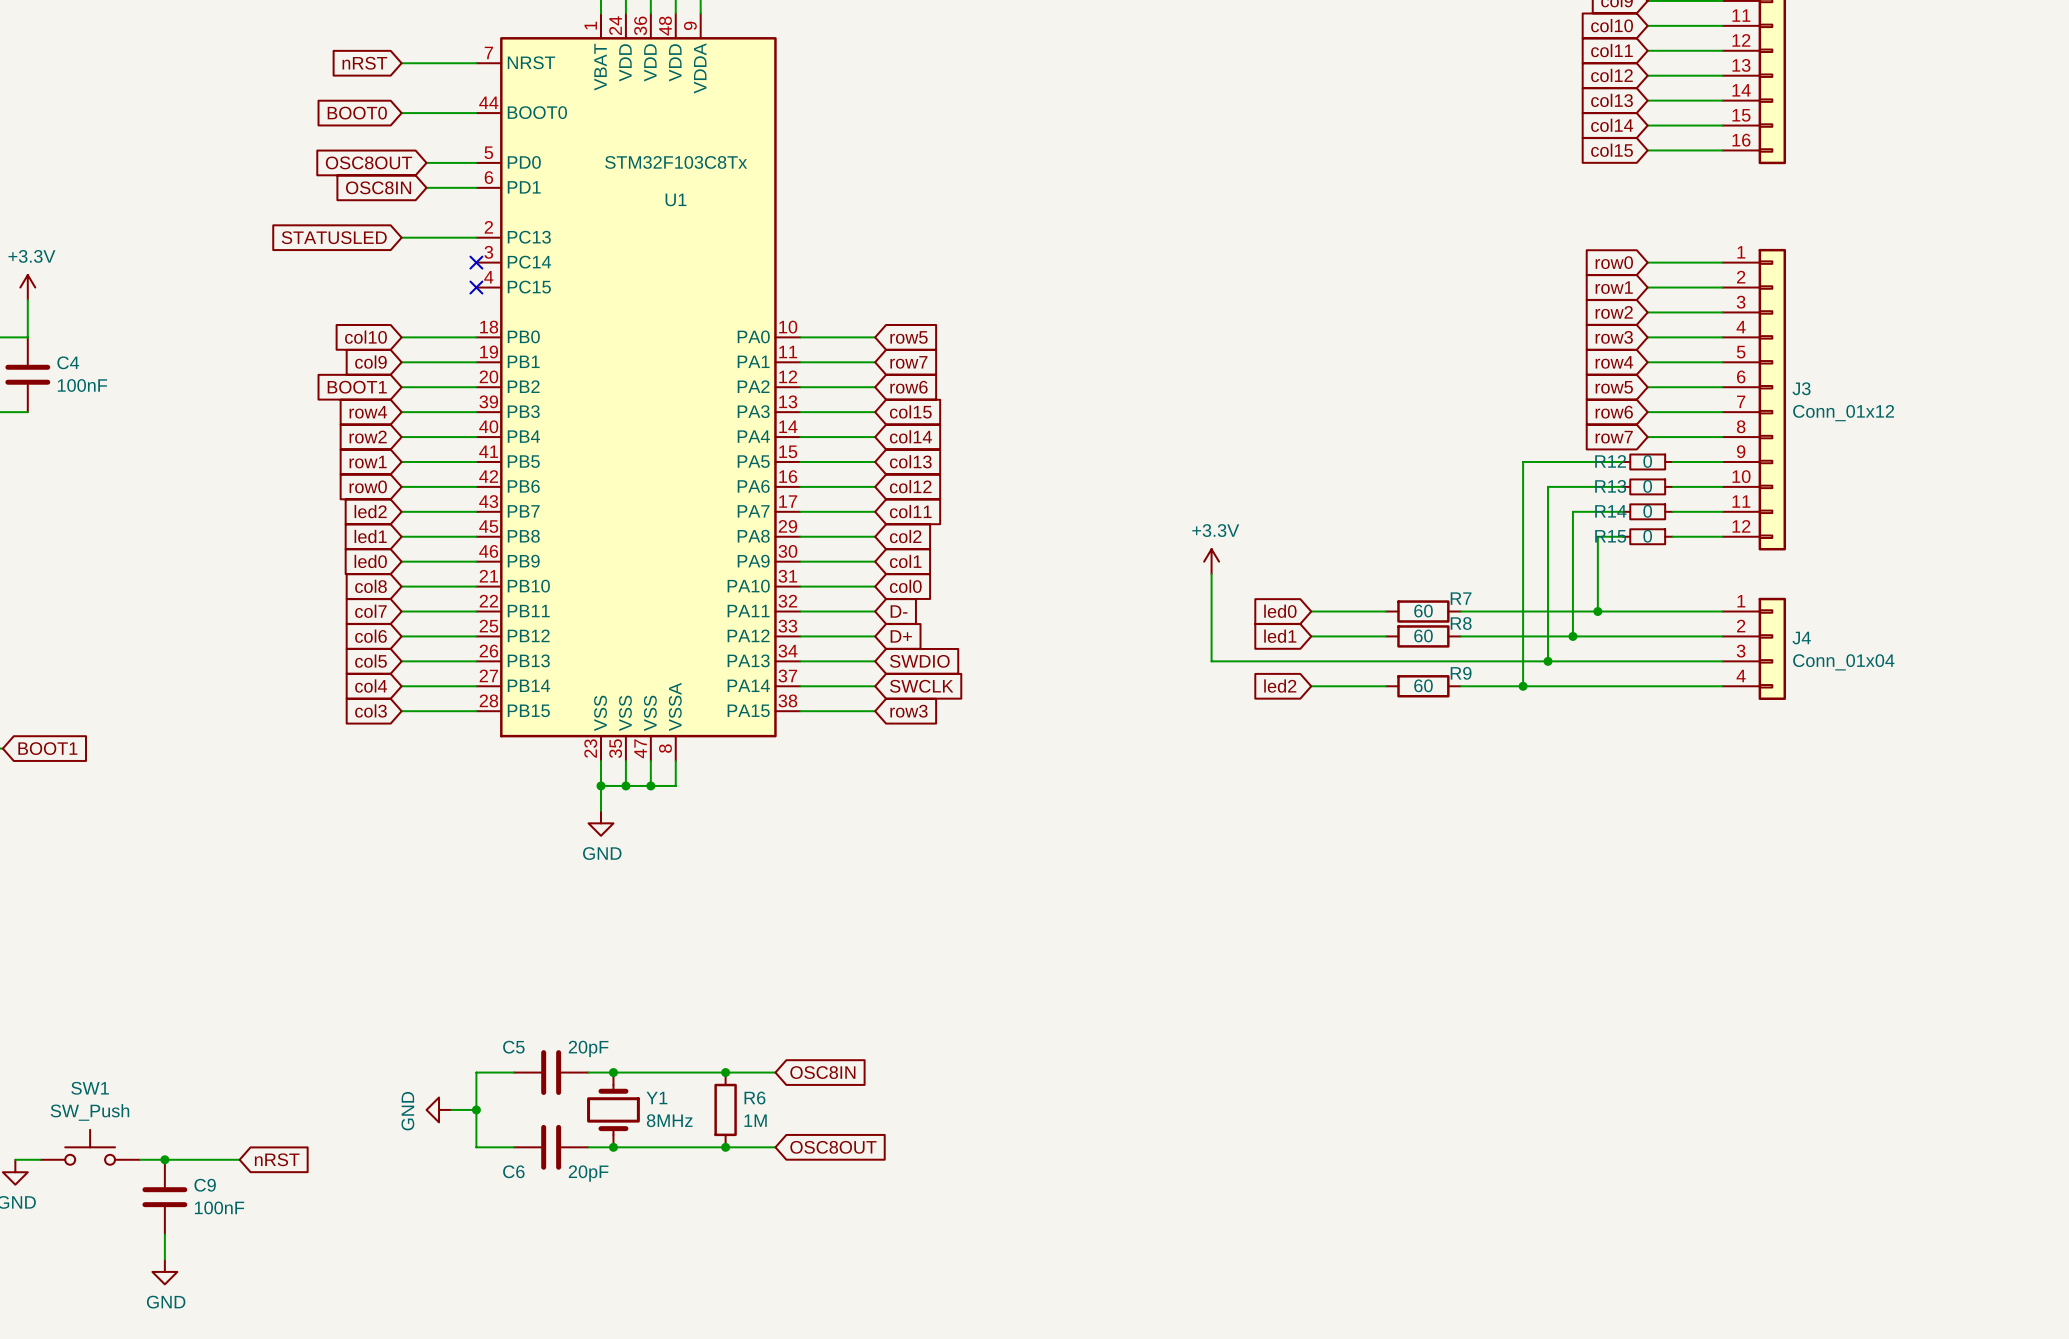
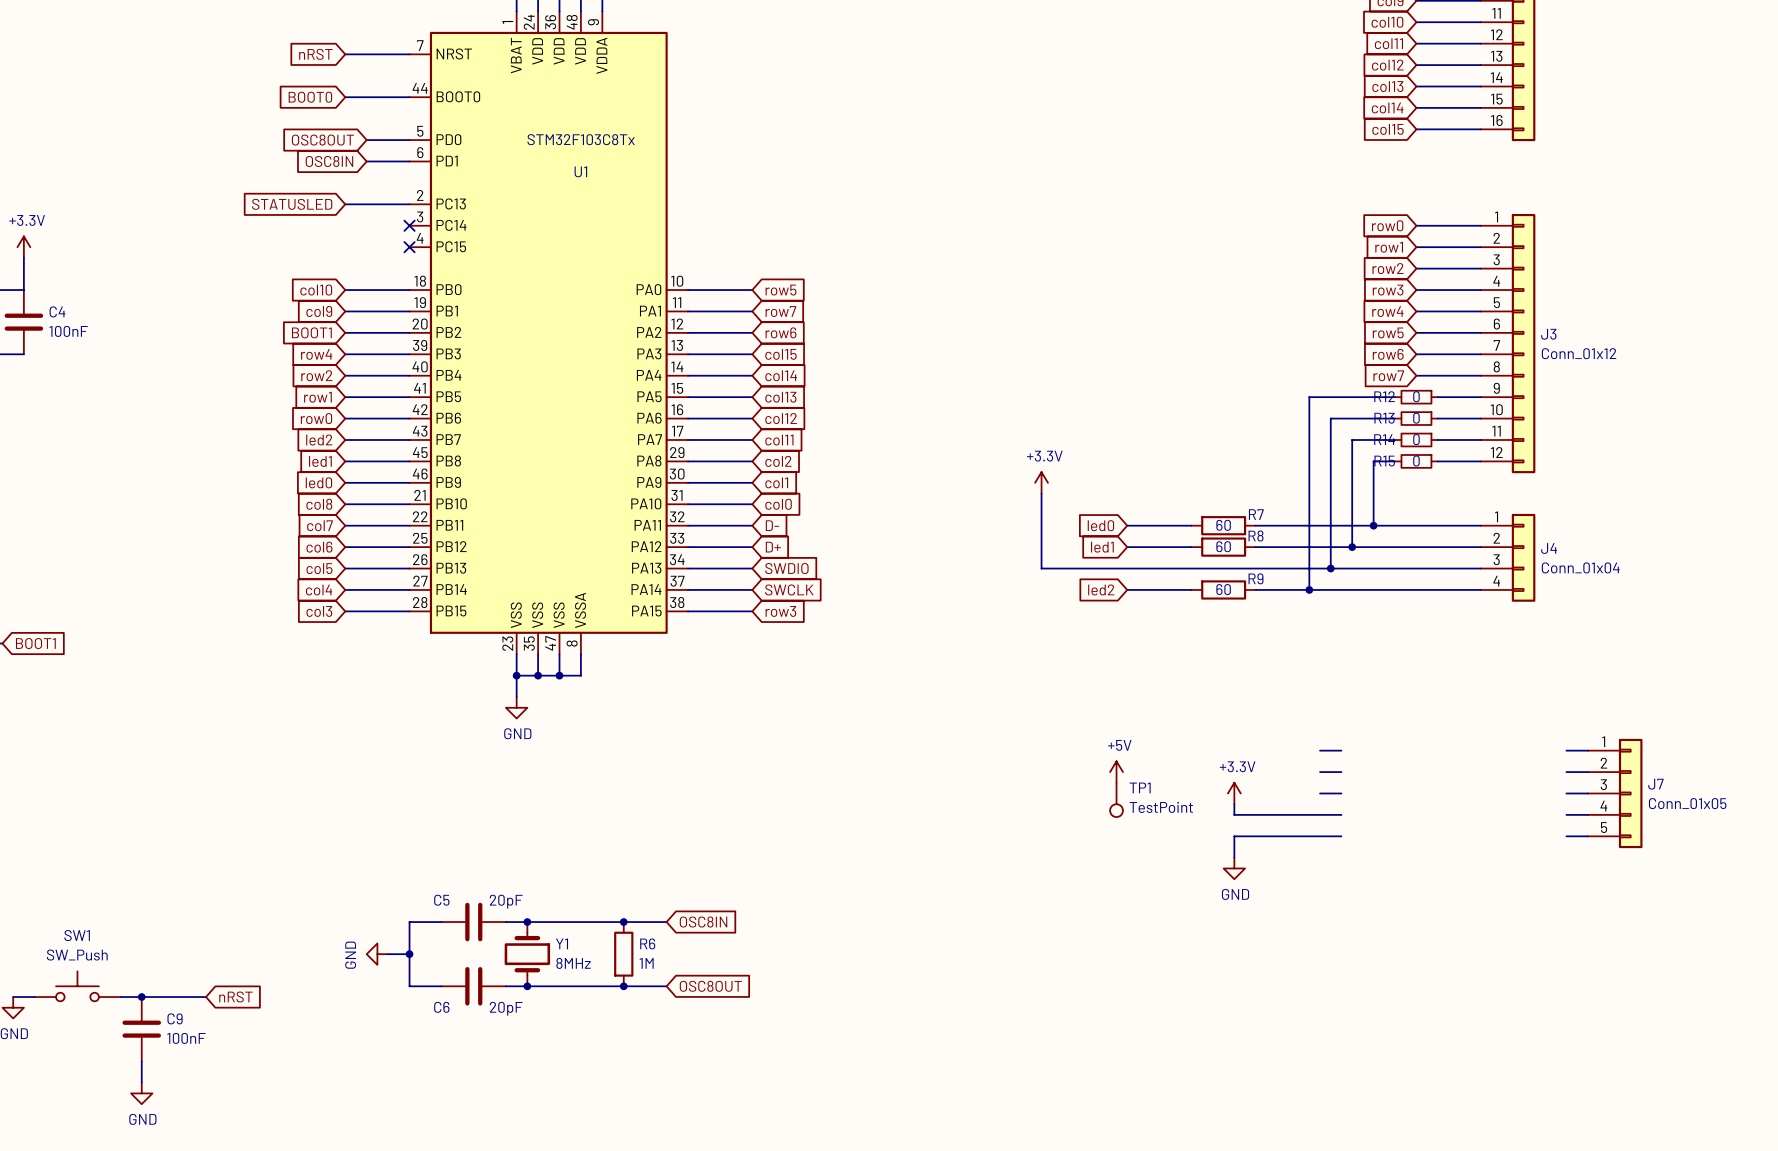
wire: none -> (1320, 750) (1341, 750)
wire: none -> (1566, 750) (1587, 750)
power symbol: none -> +5V (1116, 772)
wire: none -> (1320, 772) (1341, 772)
wire: none -> (1566, 772) (1587, 772)
power symbol: none -> +3.3V (1234, 793)
wire: none -> (1320, 793) (1341, 793)
wire: none -> (1566, 793) (1587, 793)
J7: none -> Conn_01x05 (1615, 793)
TP1: none -> TestPoint (1116, 799)
wire: none -> (1234, 804) (1234, 814) (1341, 814)
wire: none -> (1566, 814) (1587, 814)
wire: none -> (1341, 836) (1234, 836) (1234, 857)
wire: none -> (1566, 836) (1587, 836)
power symbol: none -> GND (1234, 868)

